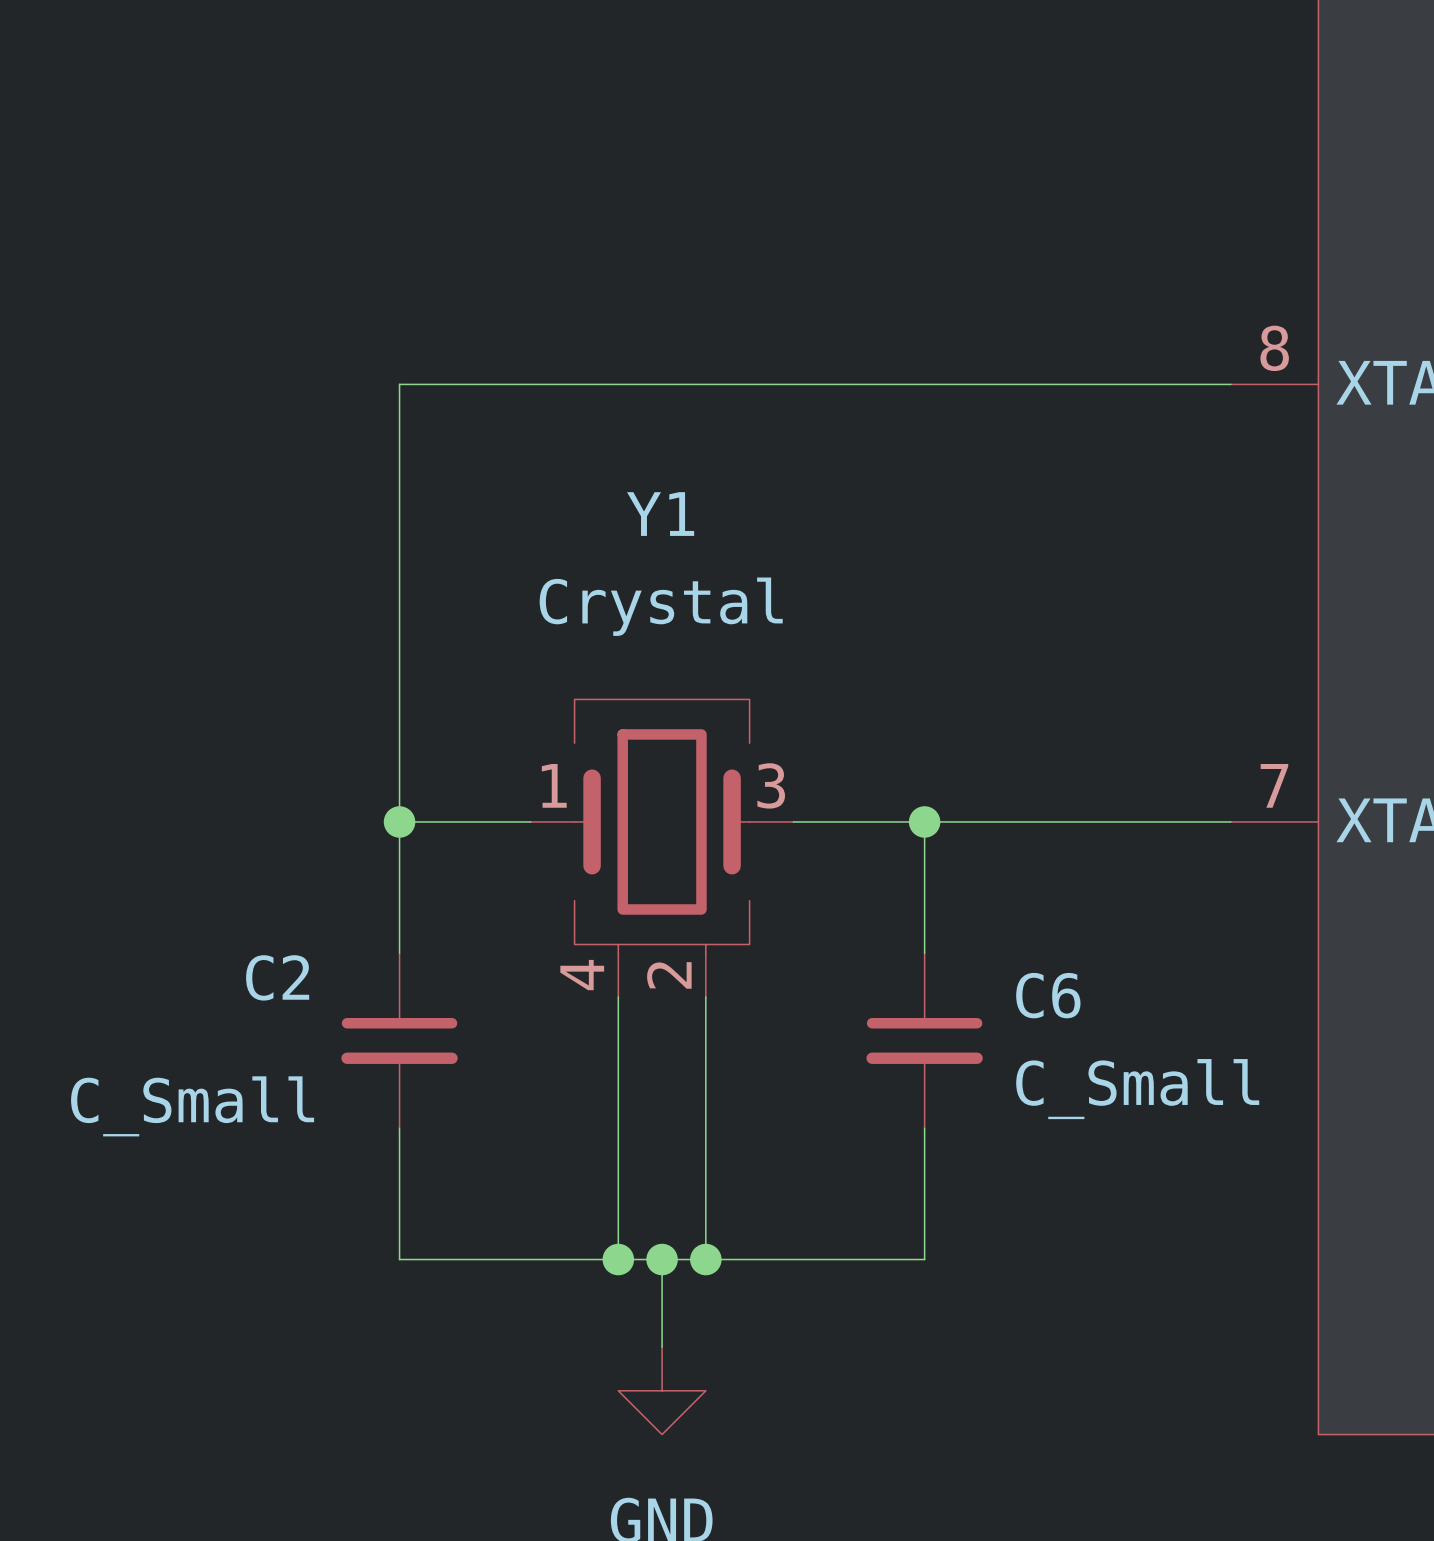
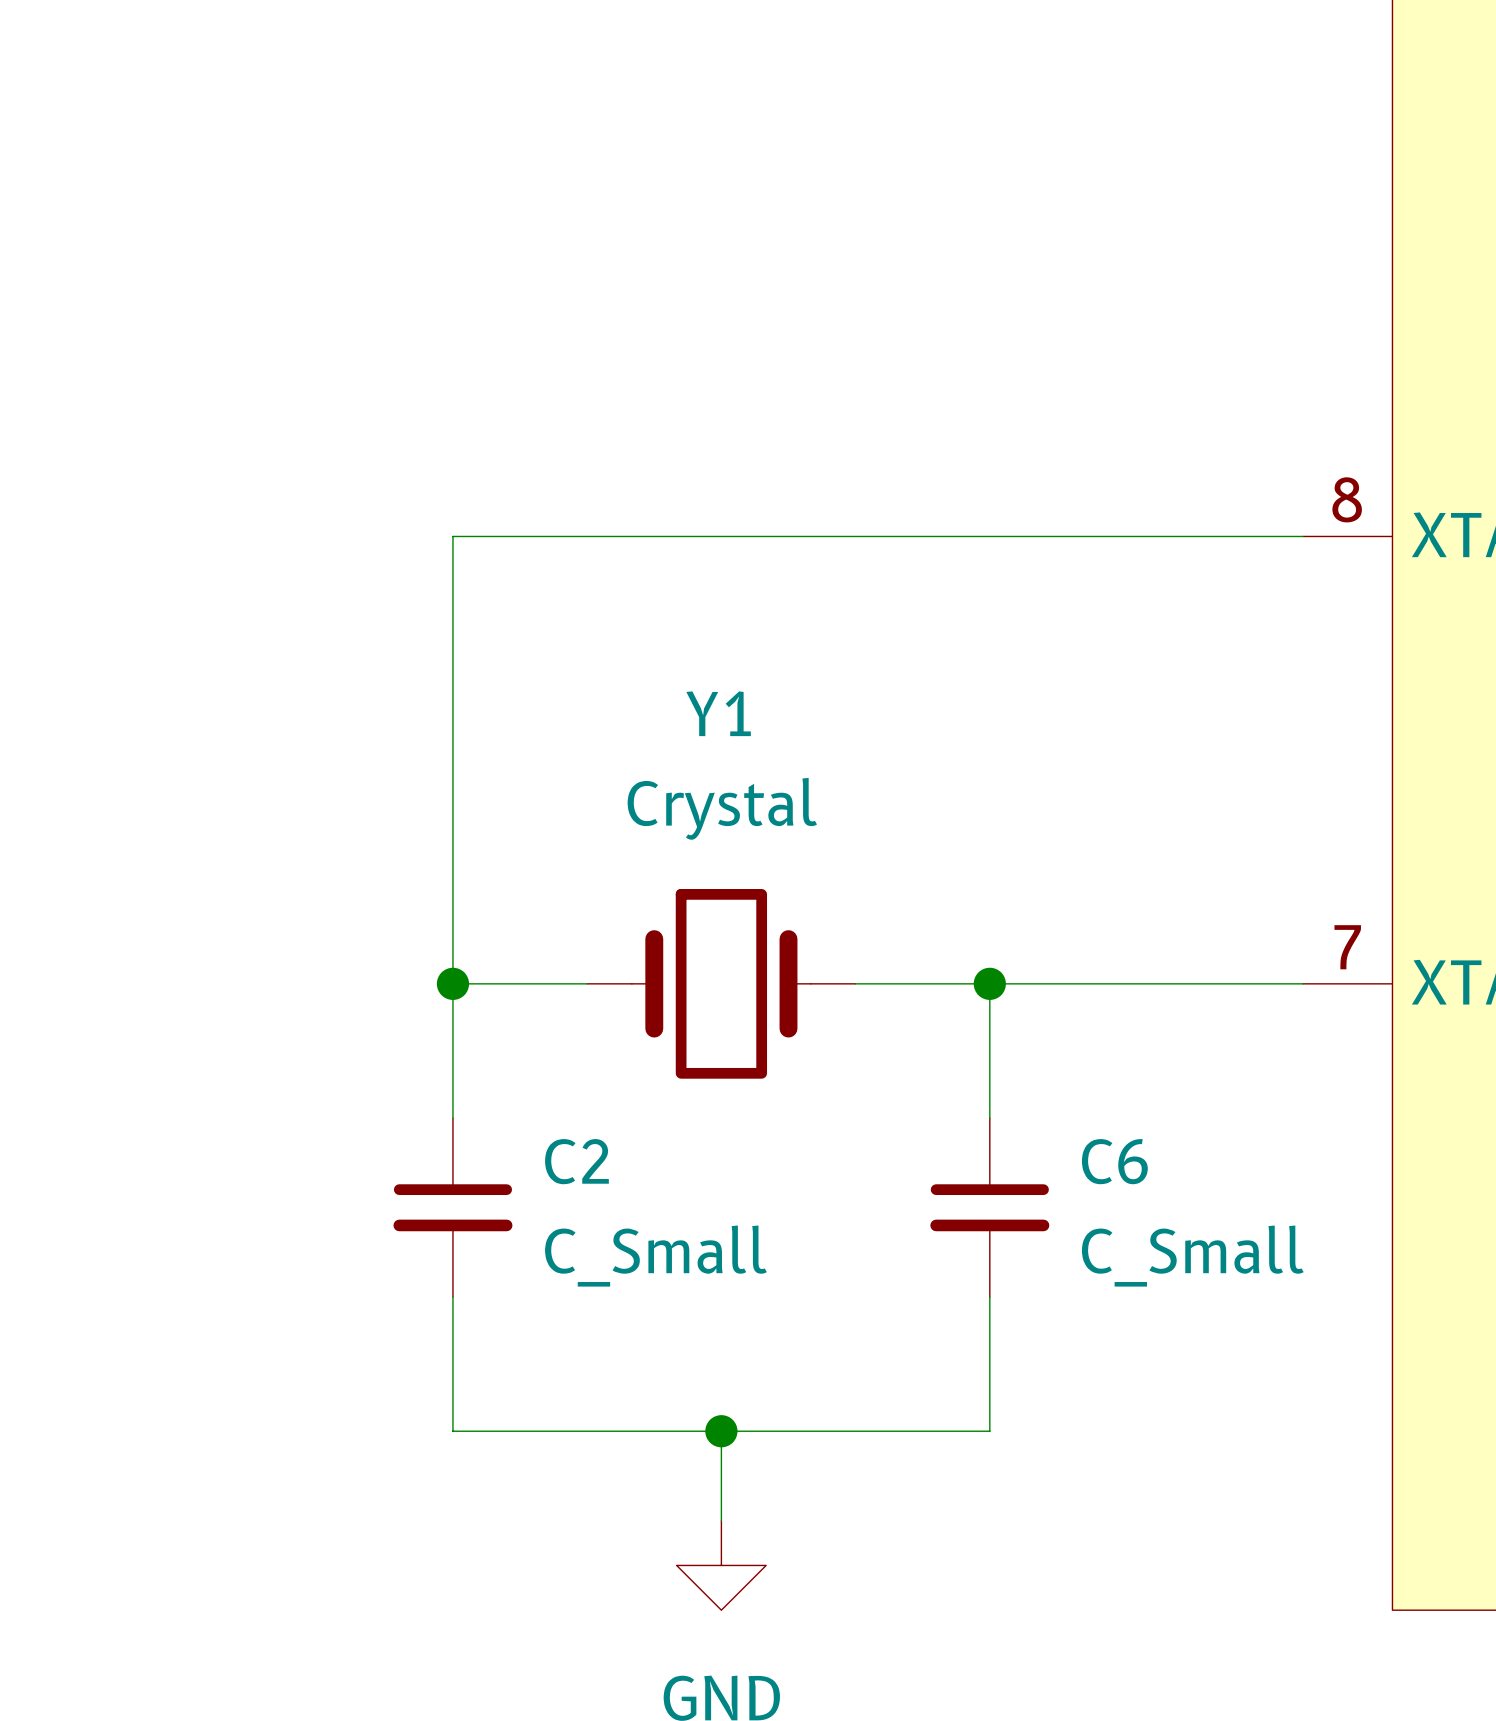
Y1 name position: Y1 (660, 514) -> Y1 (718, 713)
Y1 value position: Crystal (661, 606) -> Crystal (722, 808)
Y1 symbol: [530, 699, 794, 997] -> [587, 889, 856, 1079]
C2 name position: C2 (277, 977) -> C2 (576, 1161)
wire: (618, 996) (618, 1259) -> none
wire: (705, 996) (705, 1259) -> none
C2 value position: C_Small (192, 1106) -> C_Small (655, 1256)
junction: (618, 1259) -> none
junction: (705, 1259) -> none

